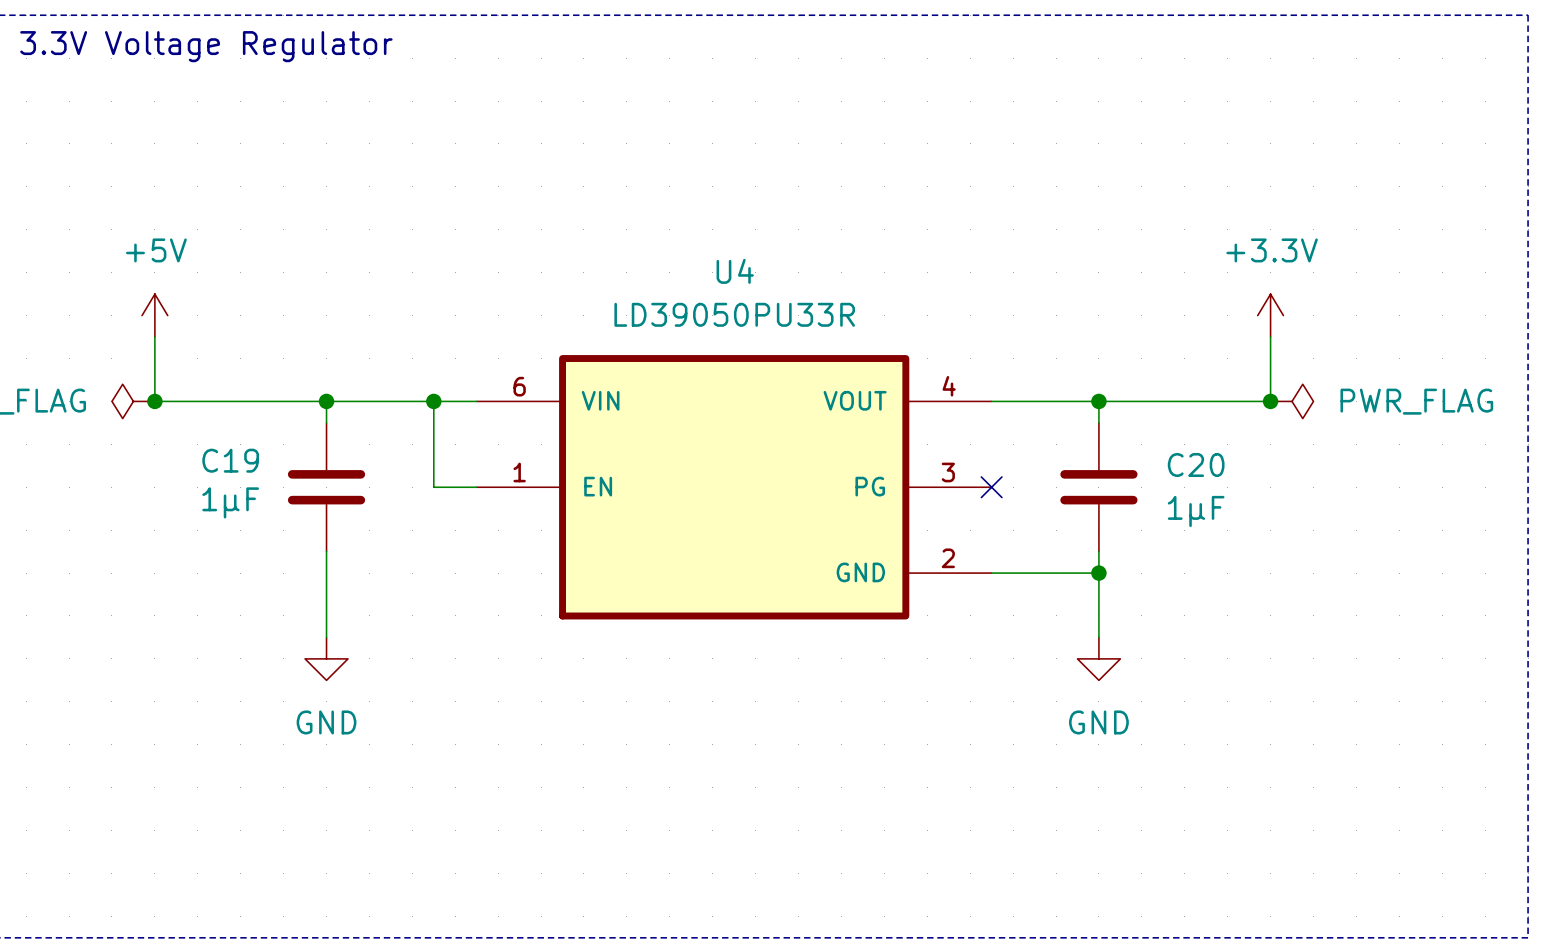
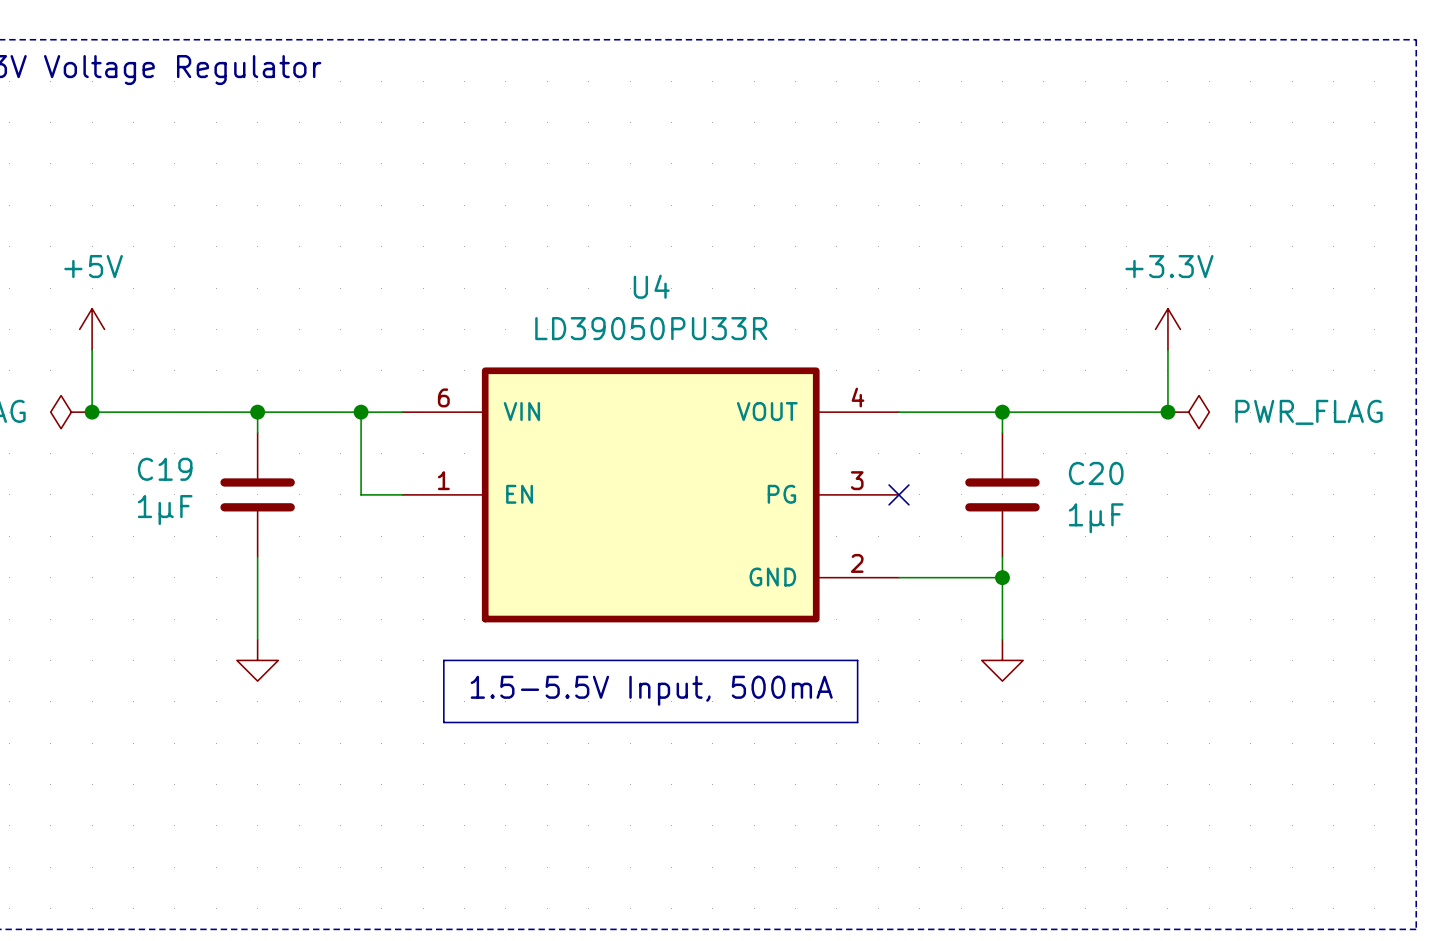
line: none -> (443, 660) (857, 660) (857, 722) (443, 722) (443, 660)
text: none -> 1.5-5.5V Input, 500mA (651, 690)
power symbol text: GND (326, 722) -> none
power symbol text: GND (1098, 722) -> none

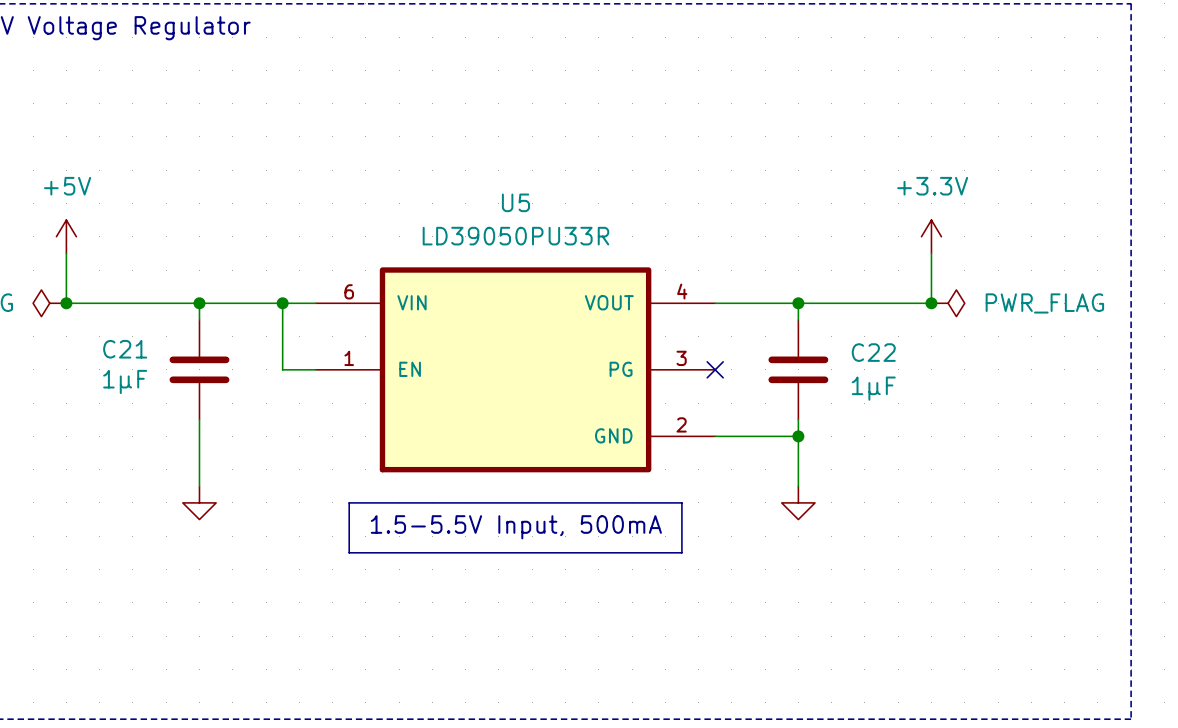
U4 name: U4 (651, 286) -> U5 (515, 202)
C19 name: C19 (165, 469) -> C21 (125, 349)
C20 name: C20 (1096, 473) -> C22 (873, 352)

